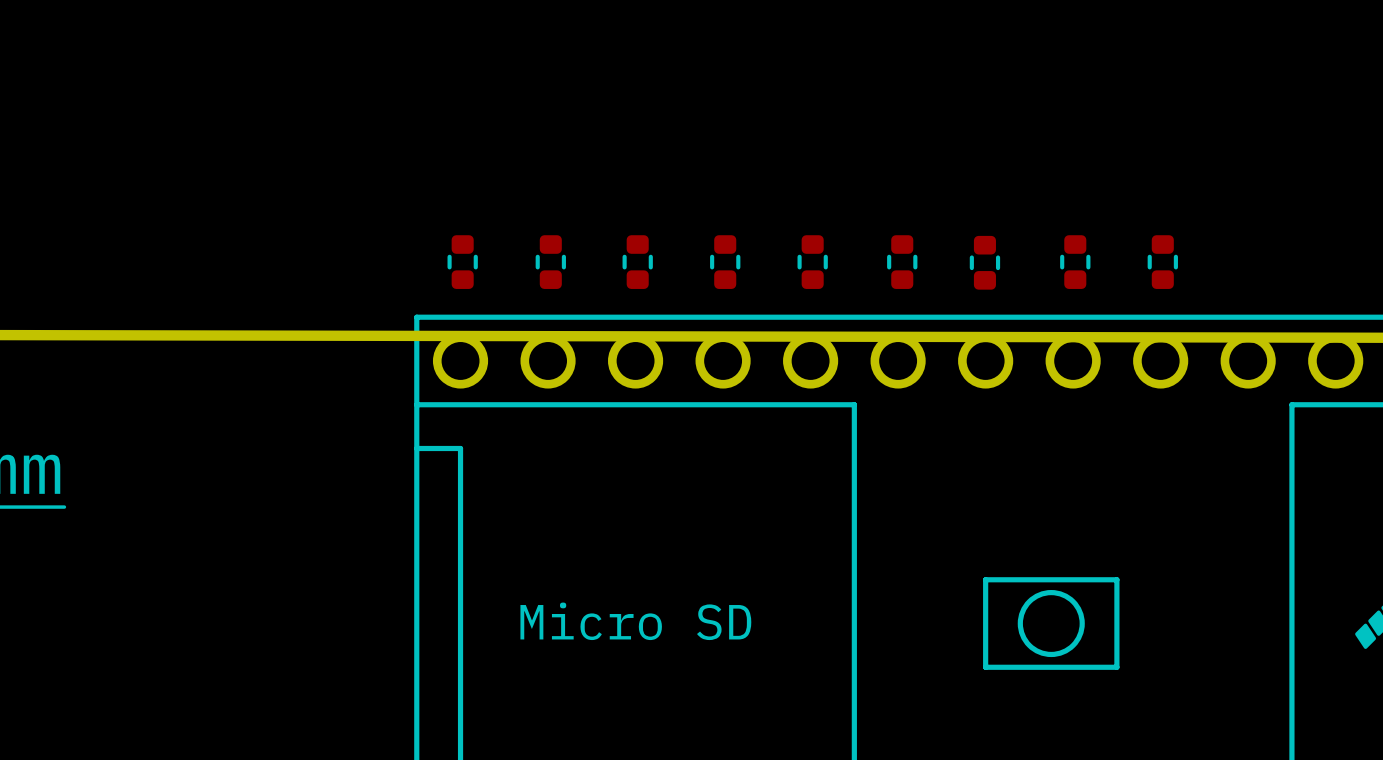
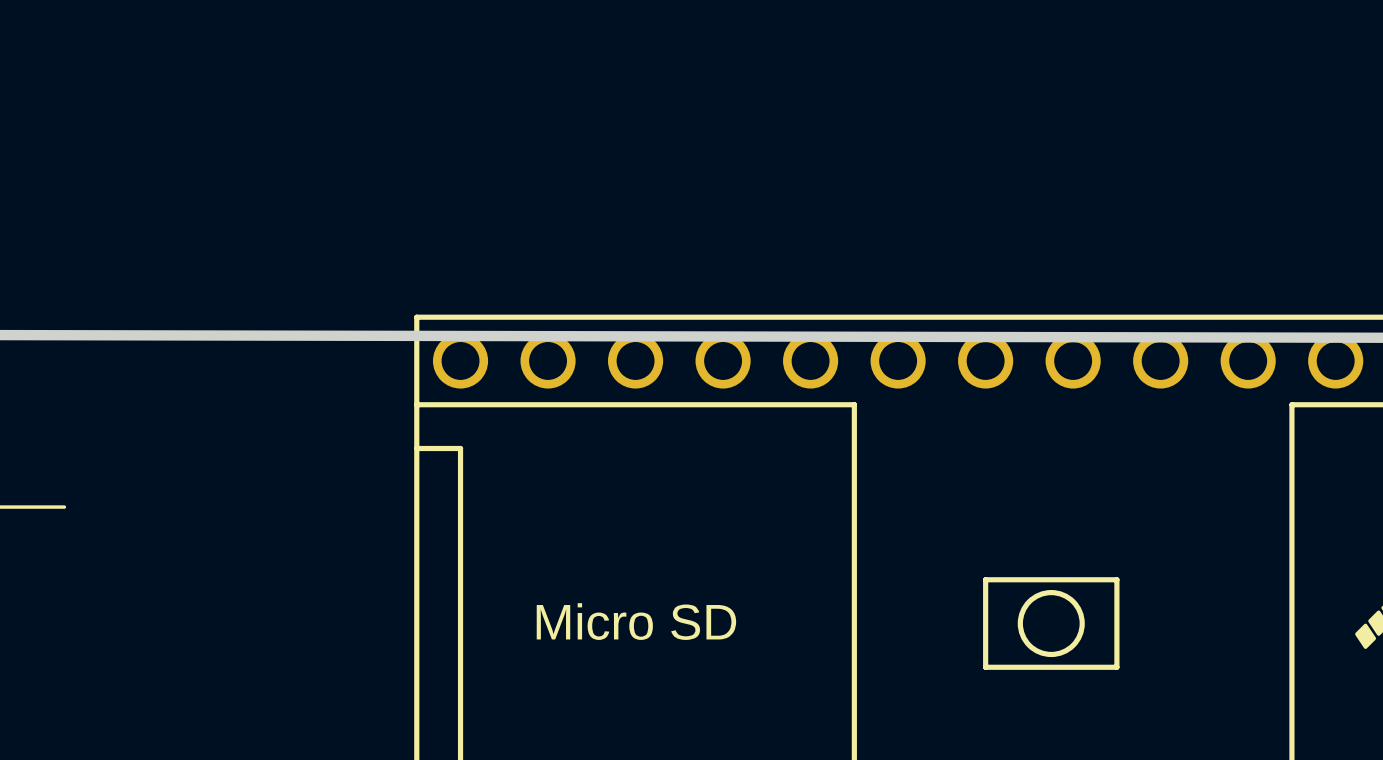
part: (462, 262) -> none
part: (550, 262) -> none
part: (637, 262) -> none
part: (725, 262) -> none
part: (812, 262) -> none
part: (902, 262) -> none
part: (984, 262) -> none
part: (1075, 262) -> none
part: (1162, 262) -> none

